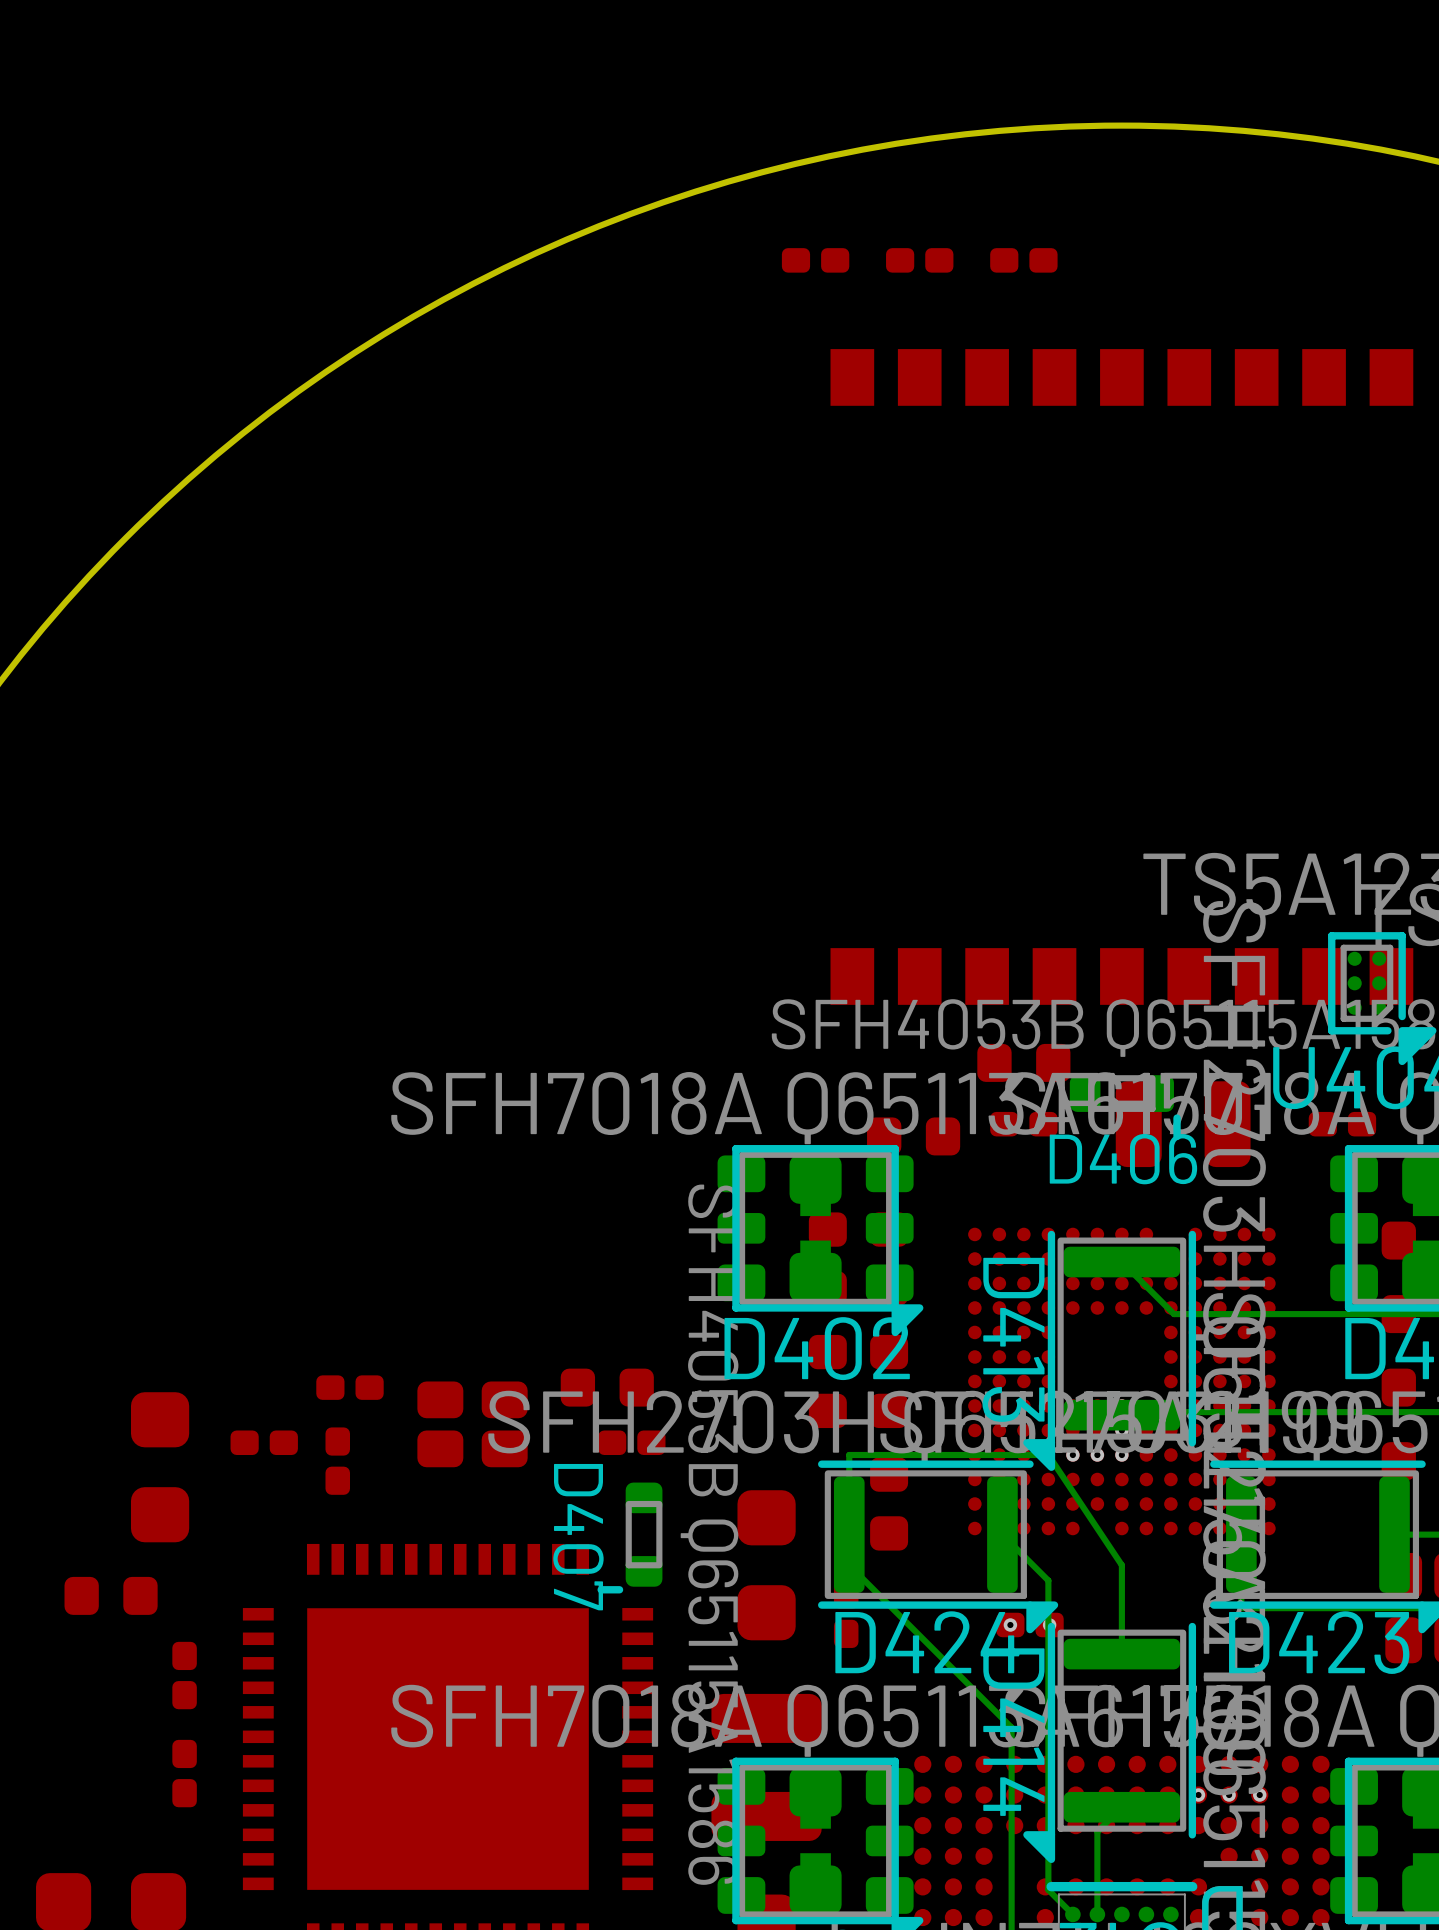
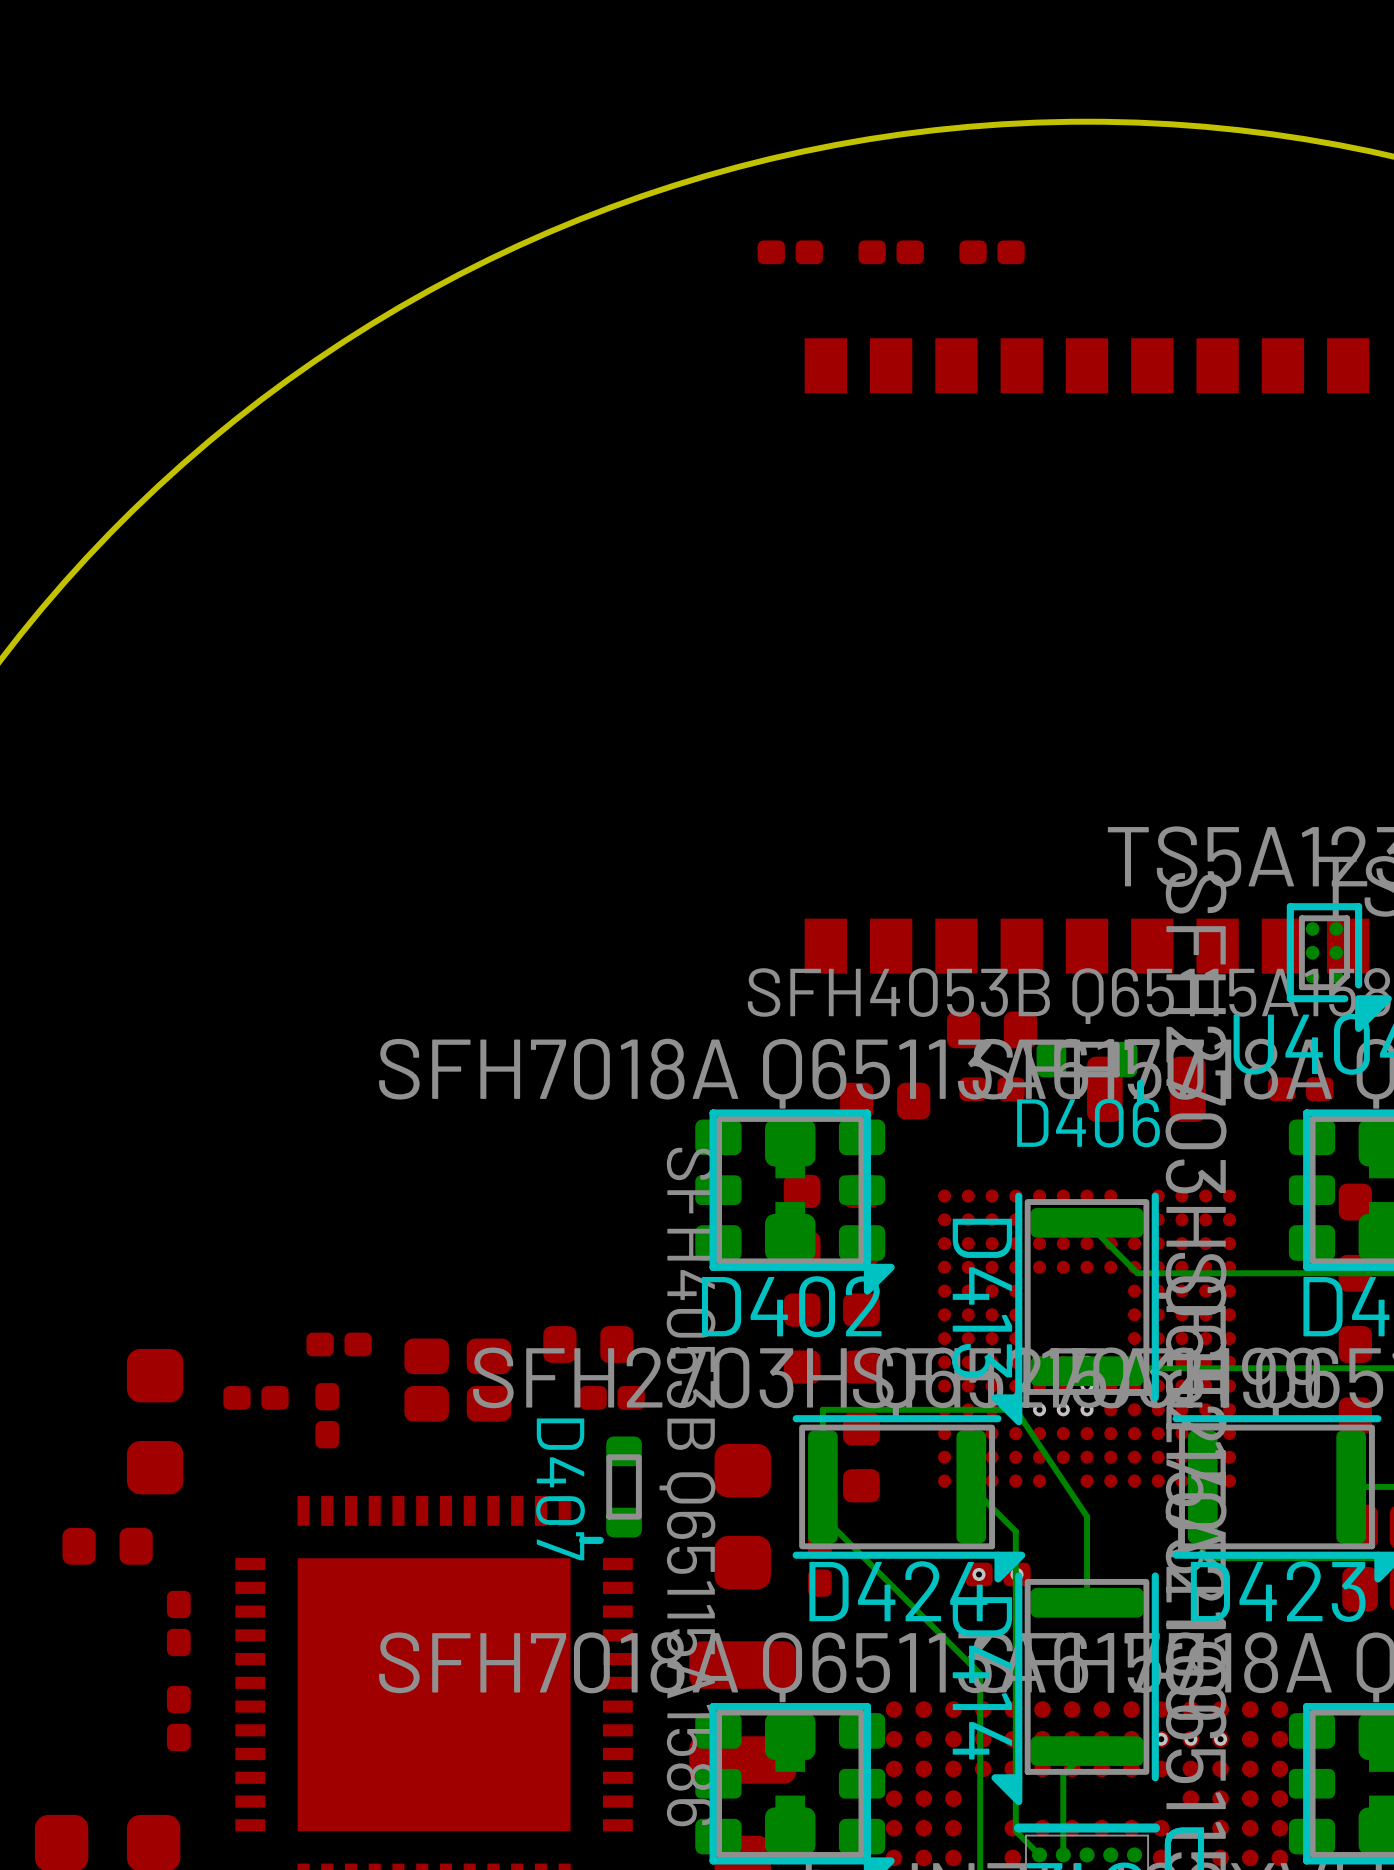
part footprint: [1115, 1081, 1251, 1168] -> [1087, 1056, 1206, 1122]

